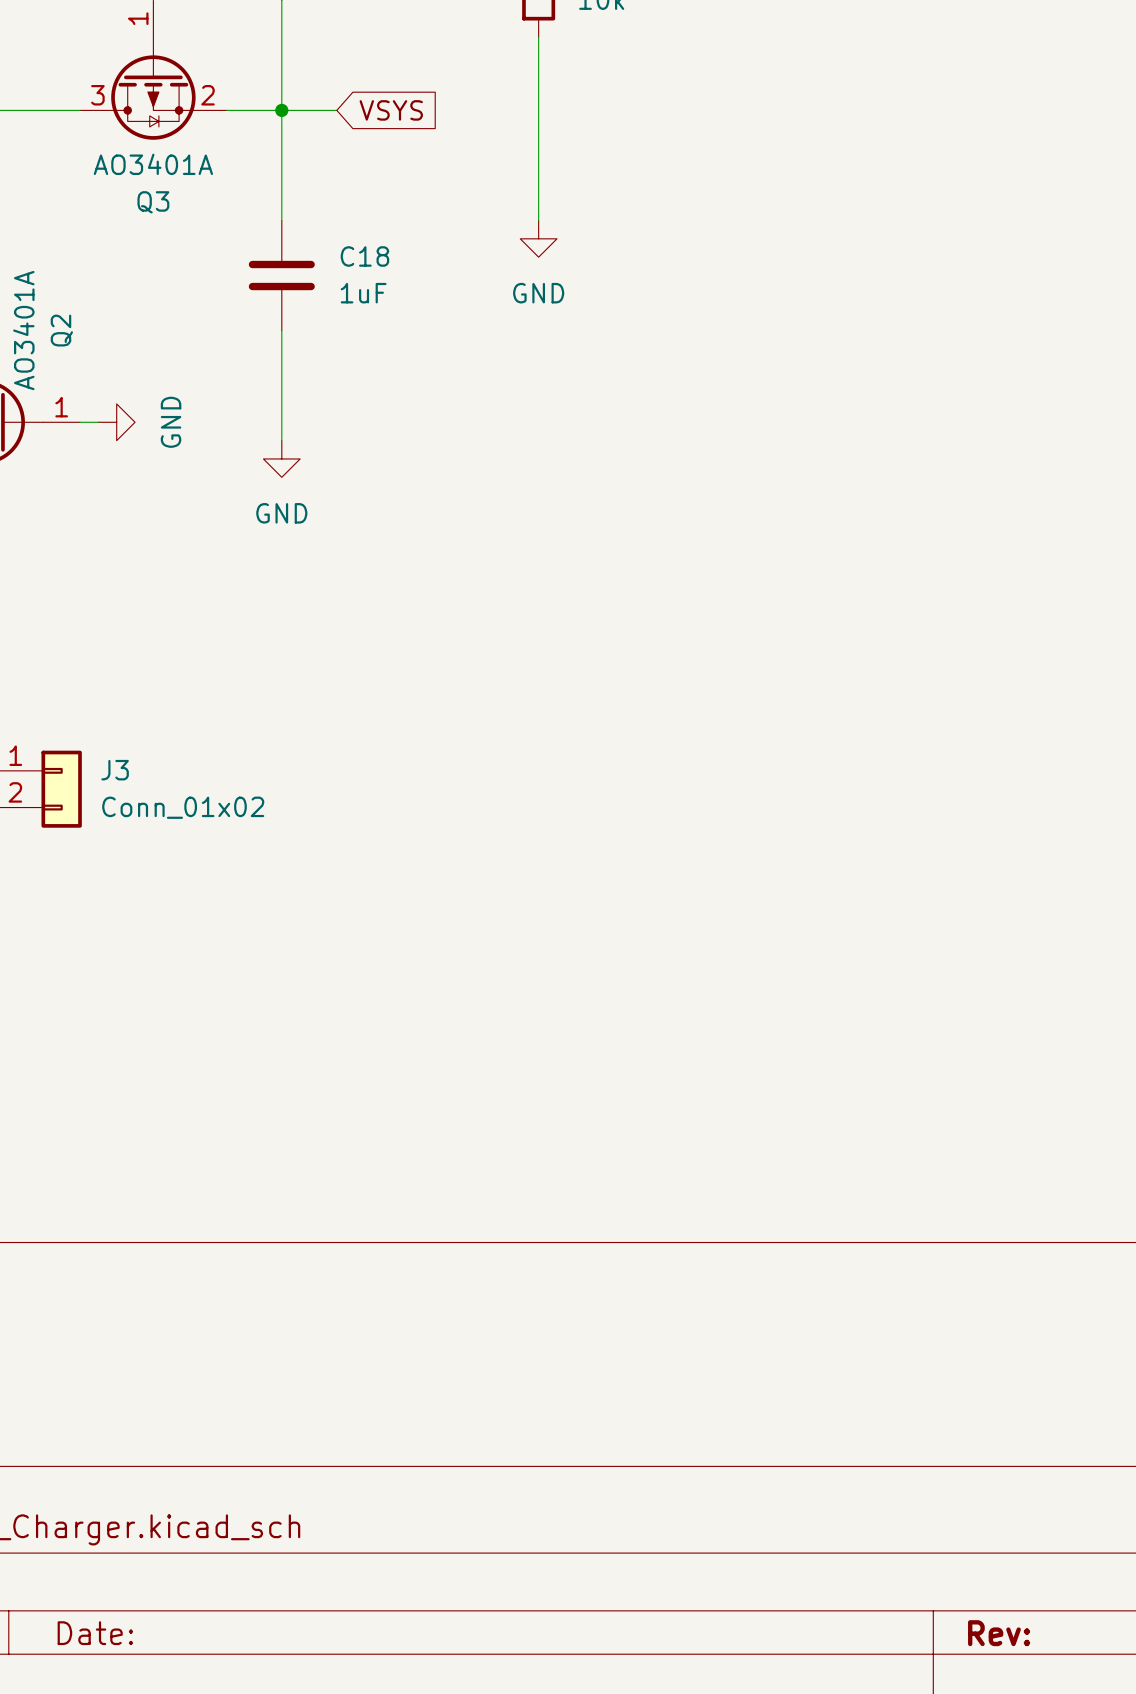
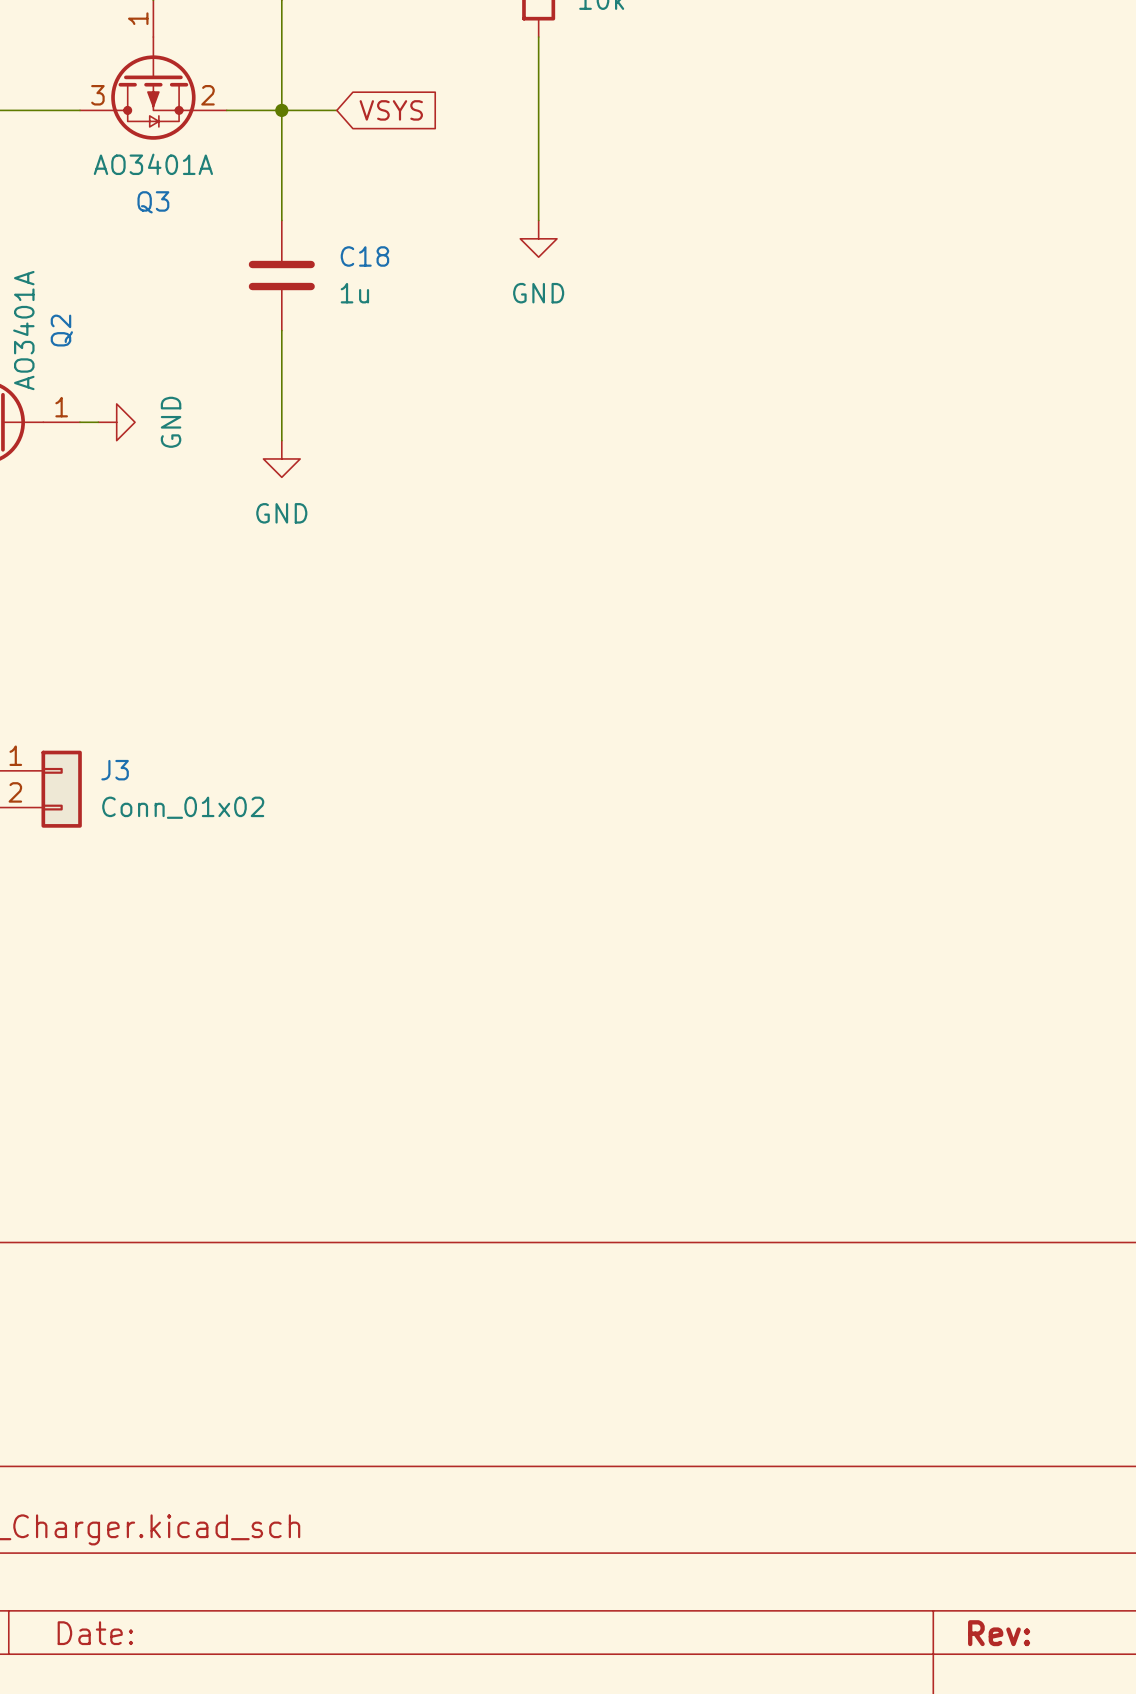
C18 value: 1uF (363, 293) -> 1u (354, 293)

